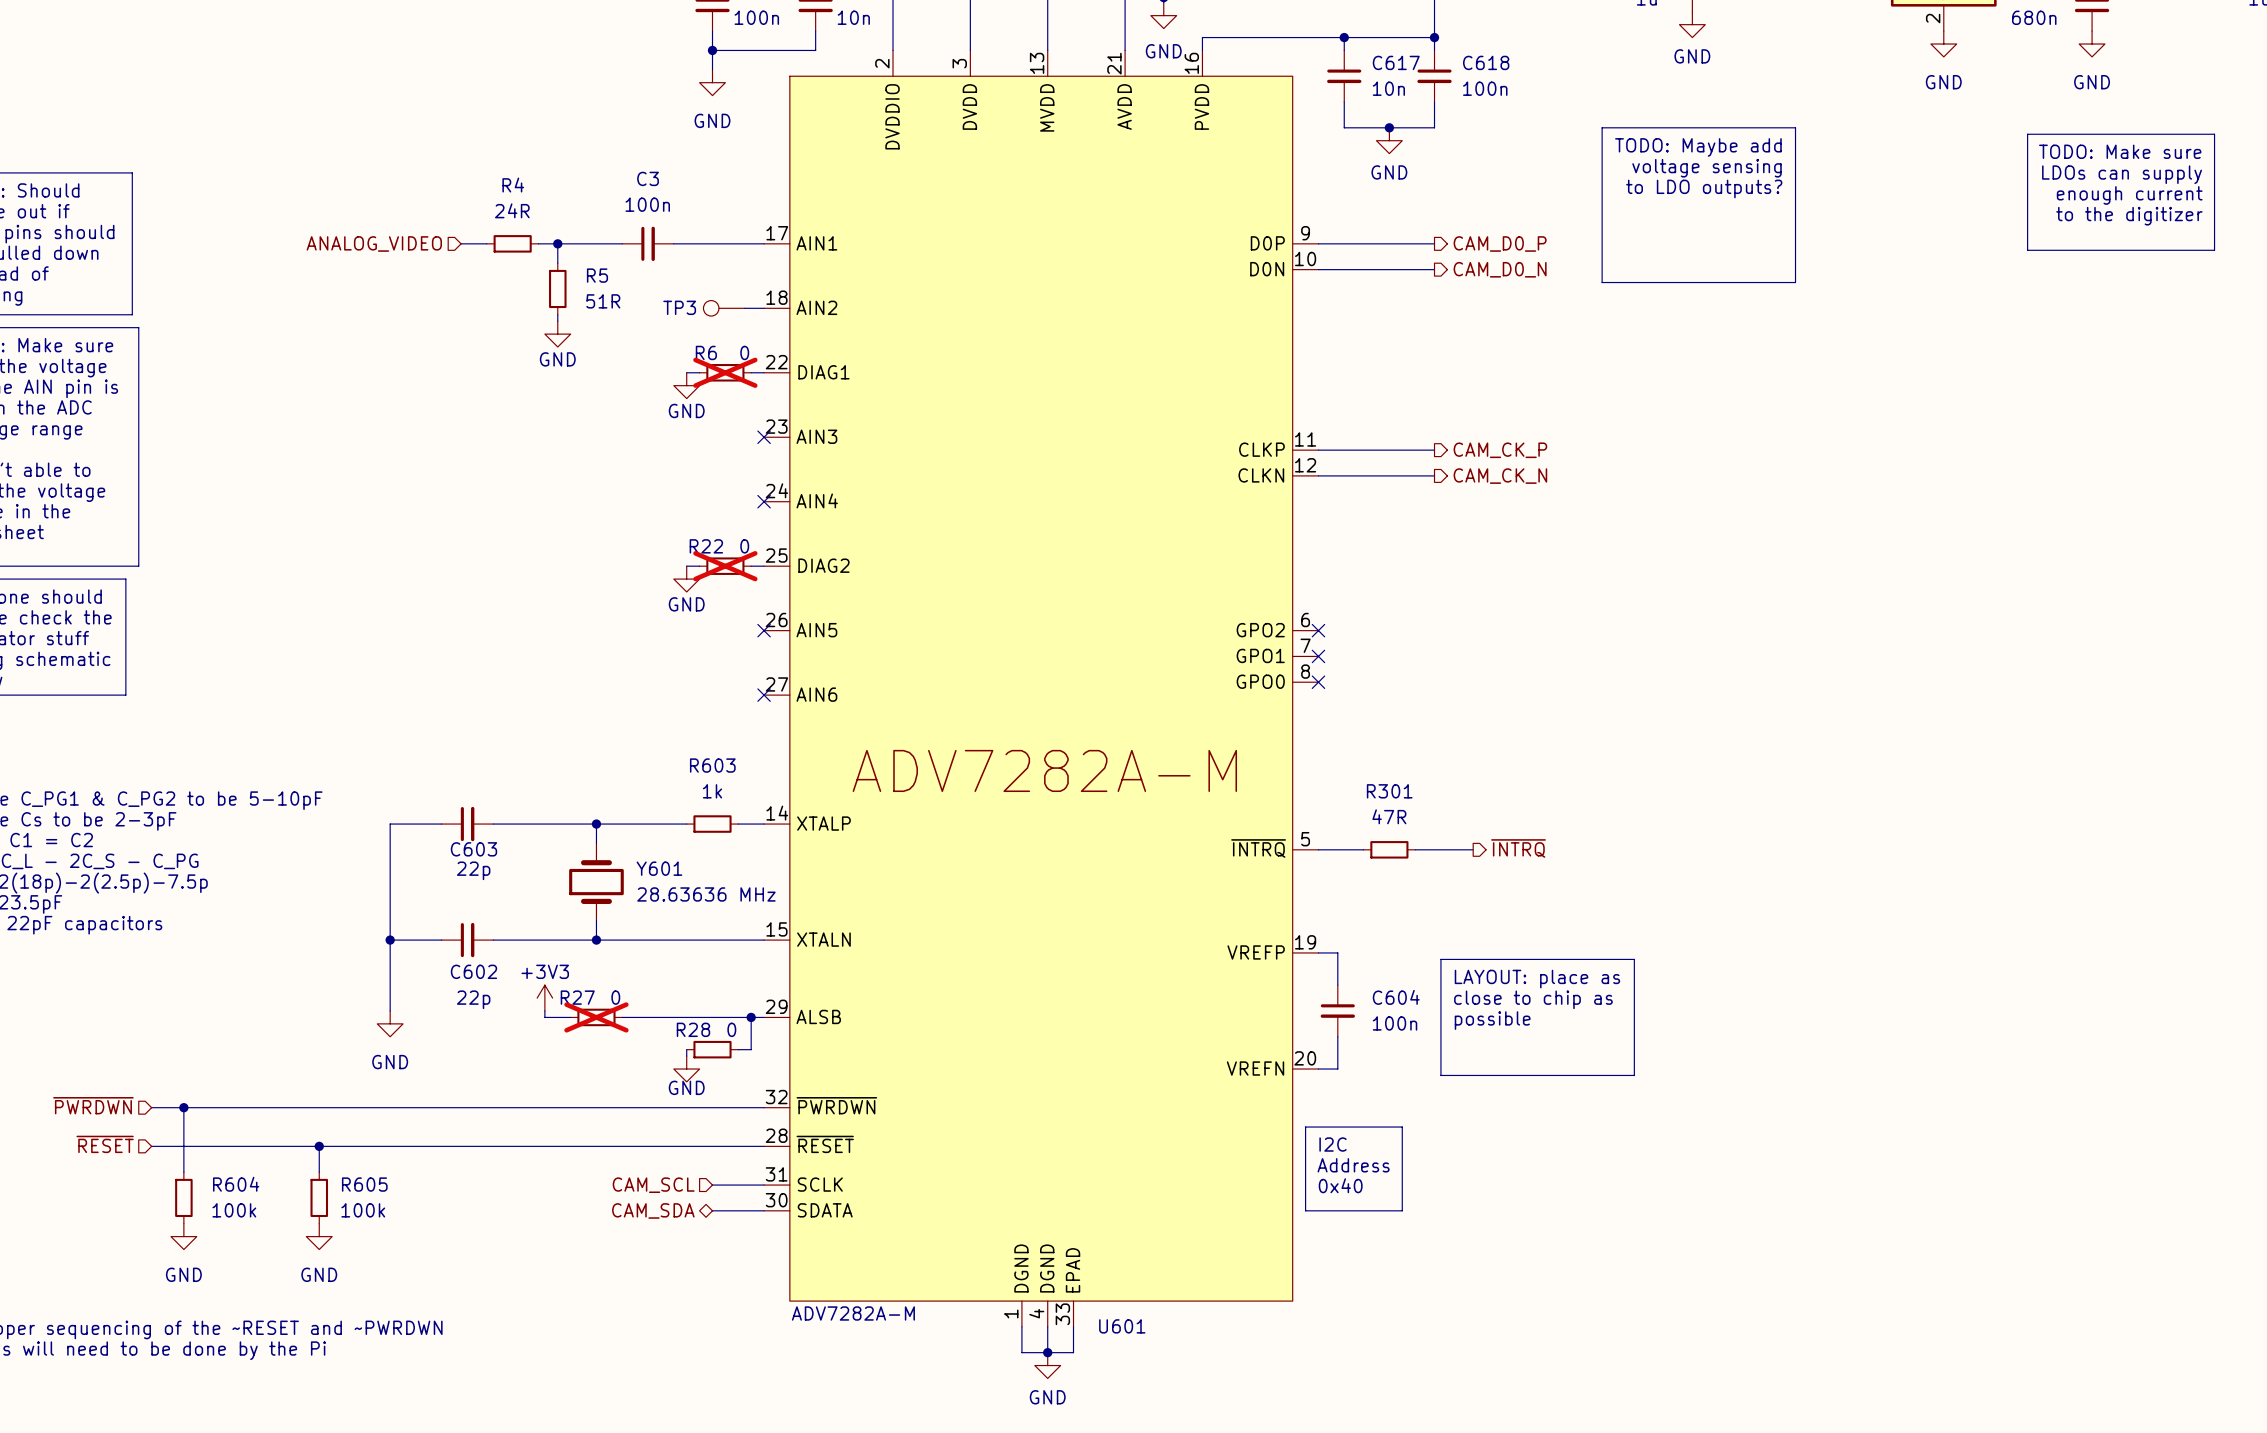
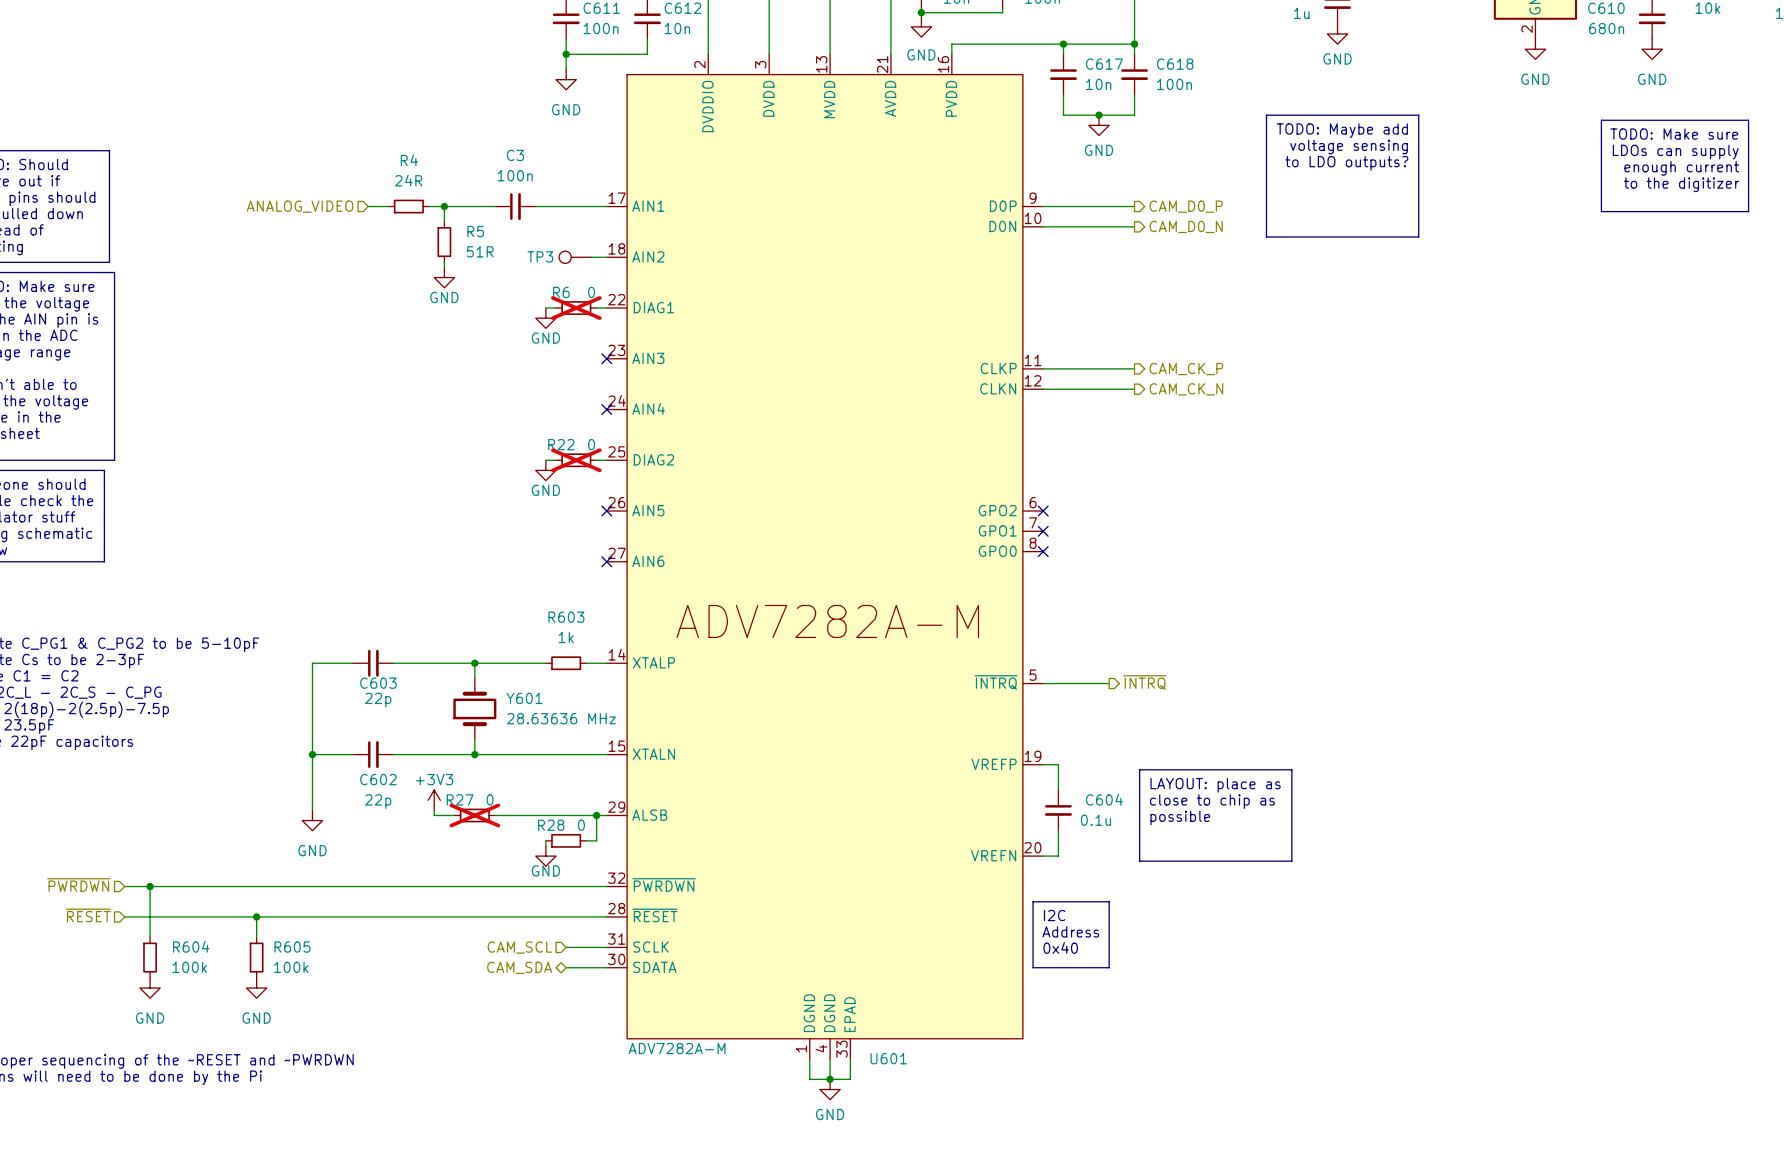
hierarchical label position: ~{INTRQ} (1518, 848) -> ~{INTRQ} (1144, 682)
wire: none -> (1078, 683) (1109, 683)
R301: 47R (1389, 849) -> none
wire: (1415, 849) (1473, 849) -> none
C604 value: 100n (1395, 1023) -> 0.1u (1095, 820)

